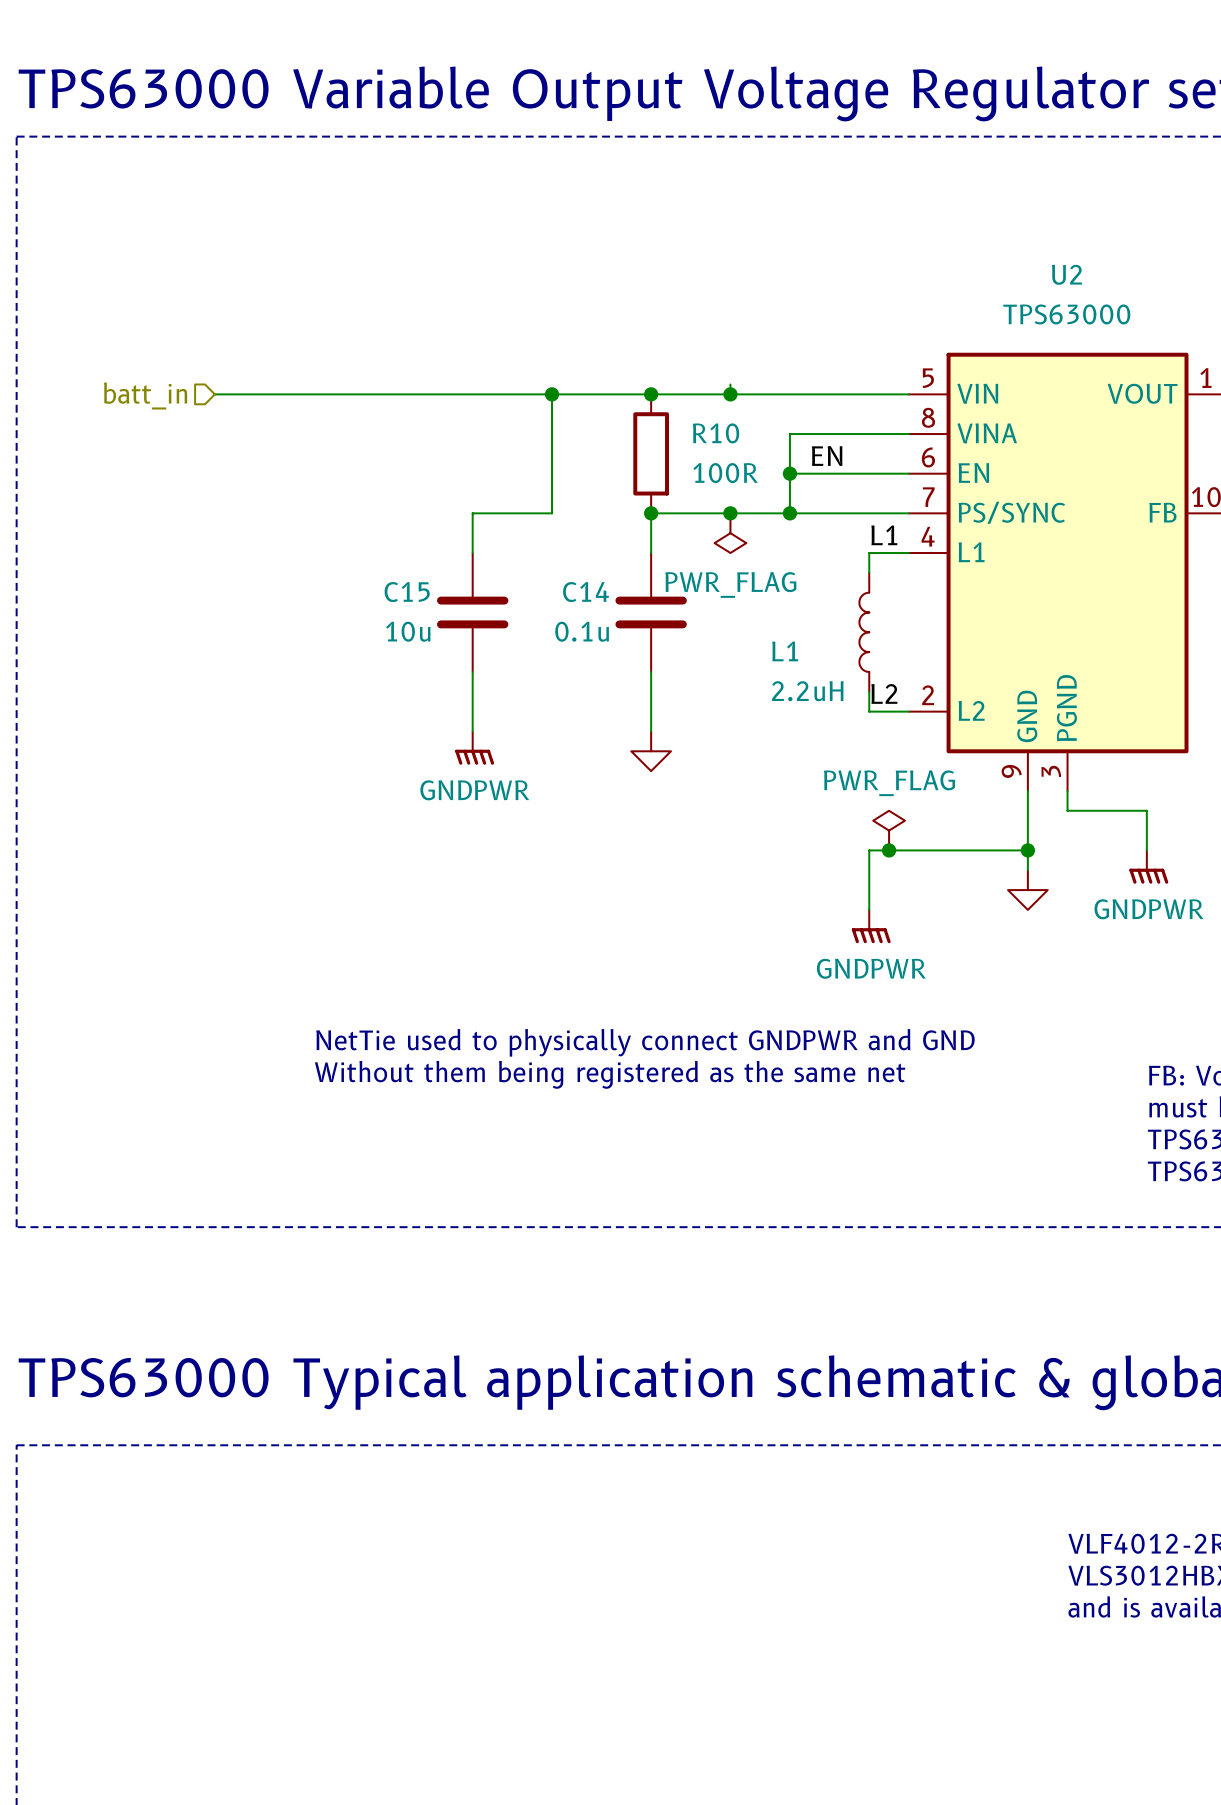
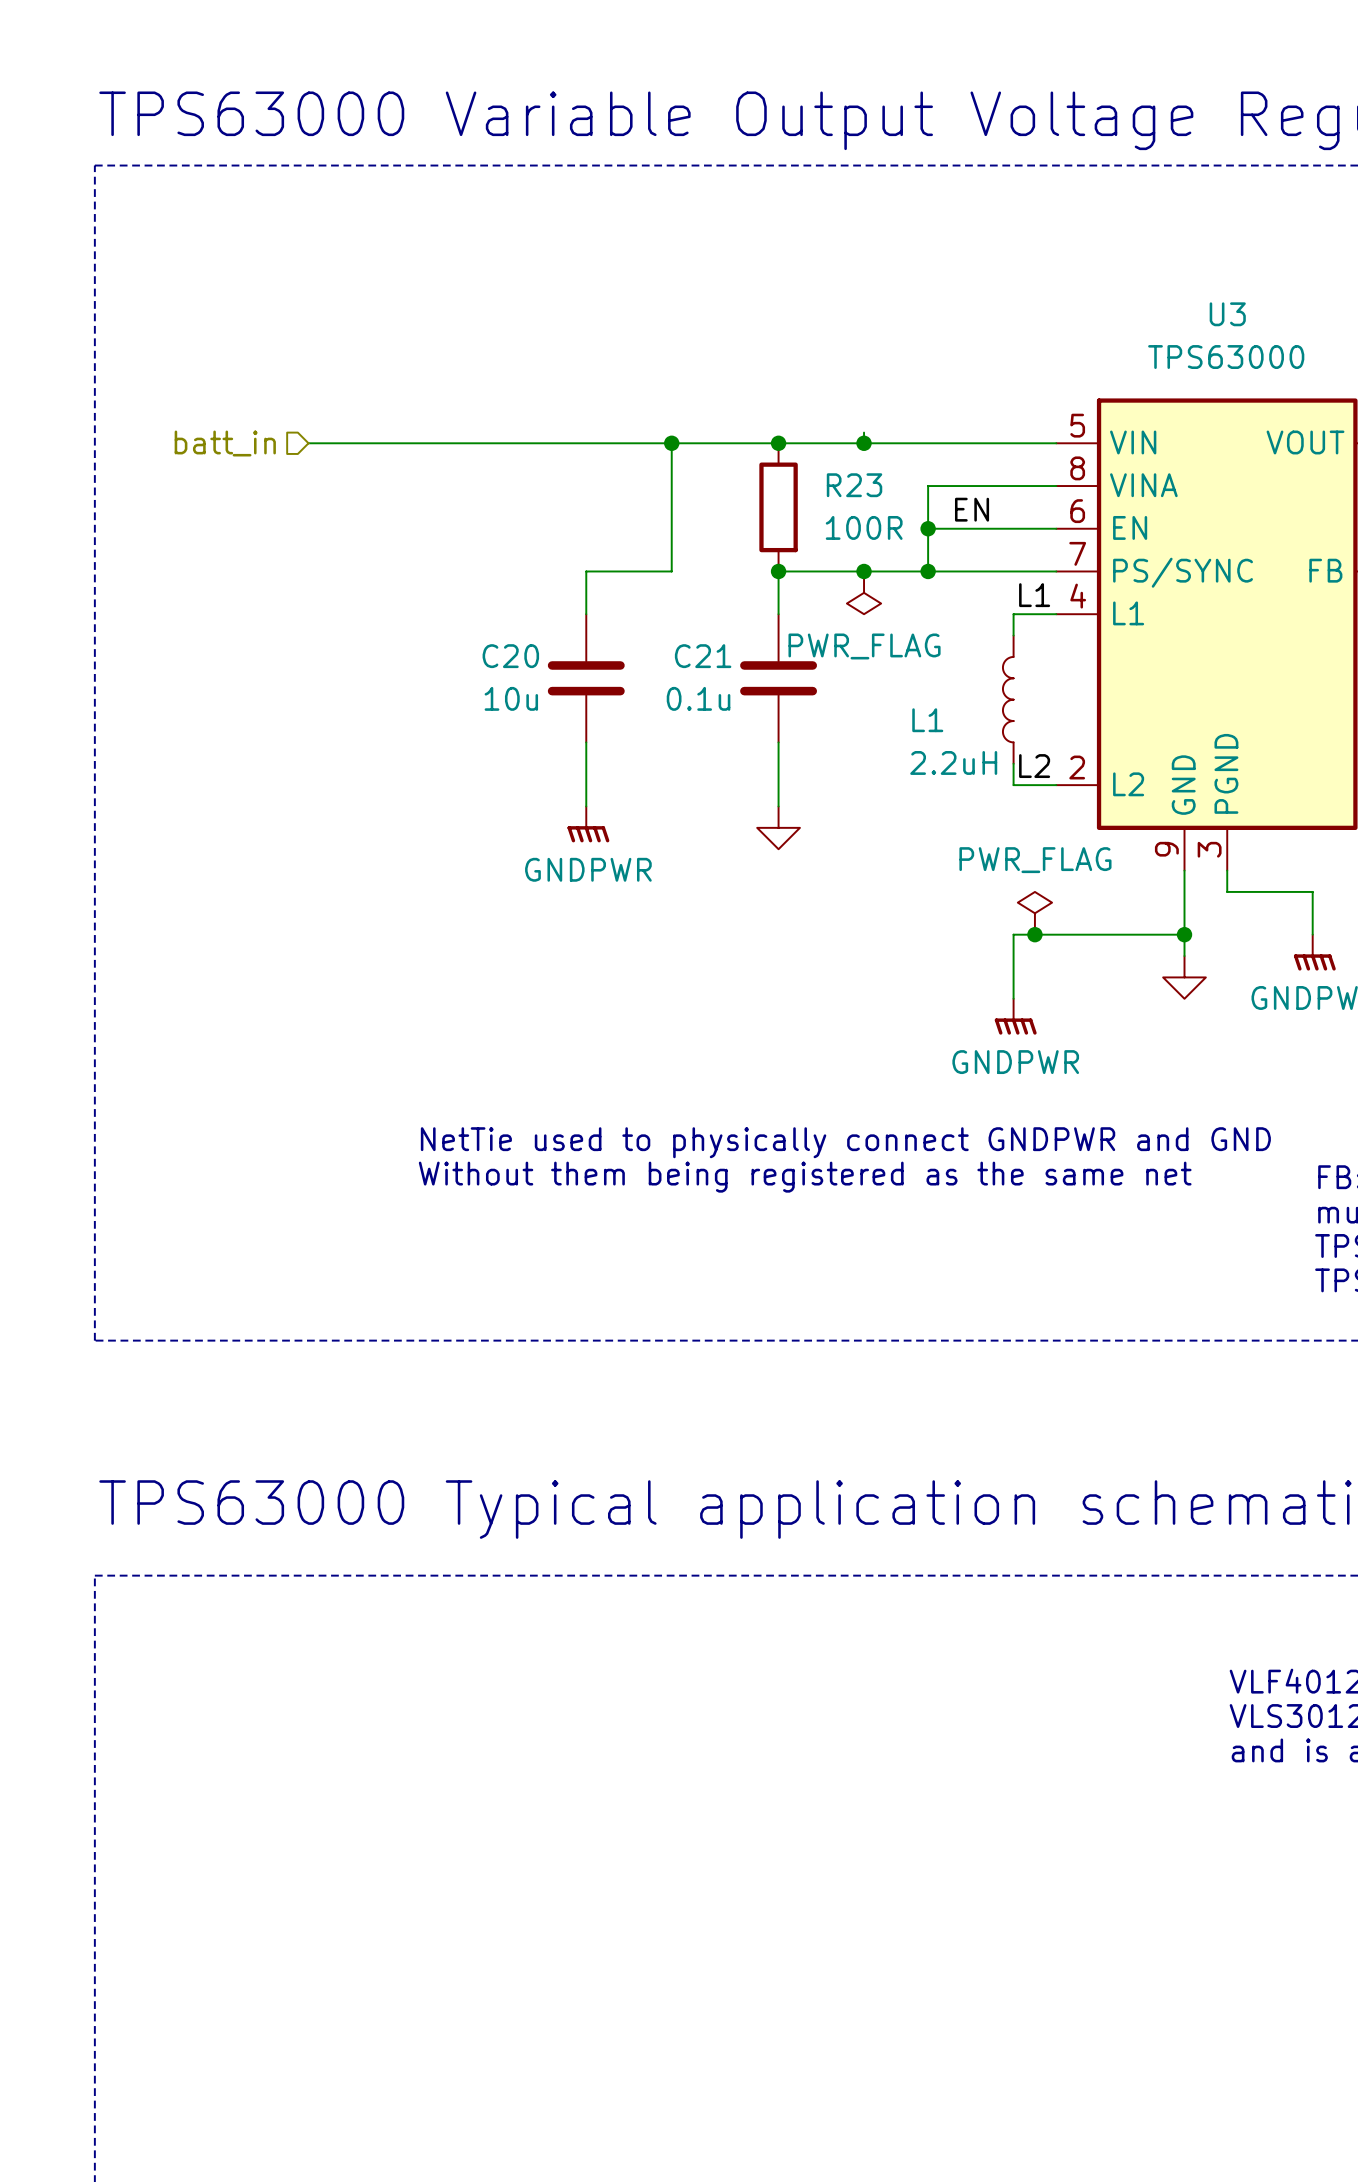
U2 name: U2 (1066, 274) -> U3 (1227, 314)
R10 name: R10 (716, 433) -> R23 (854, 485)
C15 name: C15 (407, 592) -> C20 (510, 656)
C14 name: C14 (585, 592) -> C21 (703, 656)

